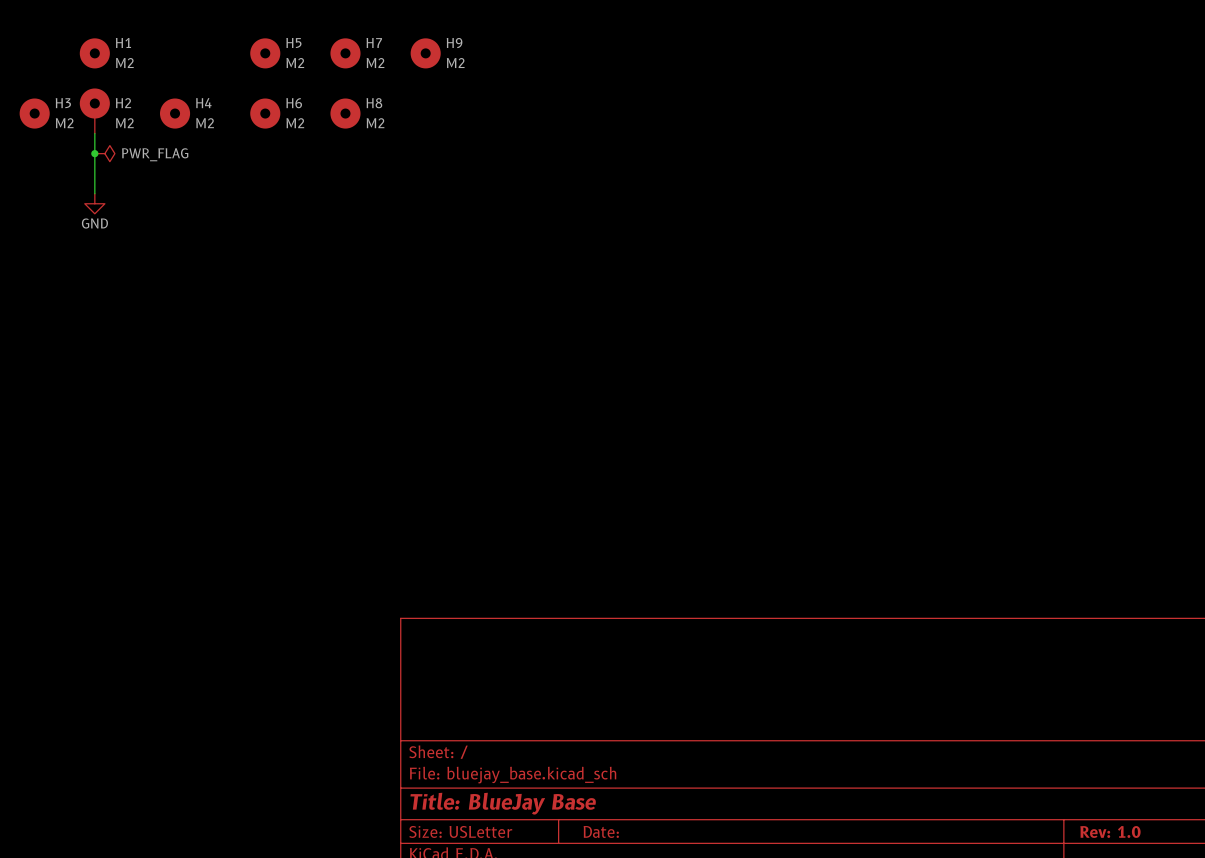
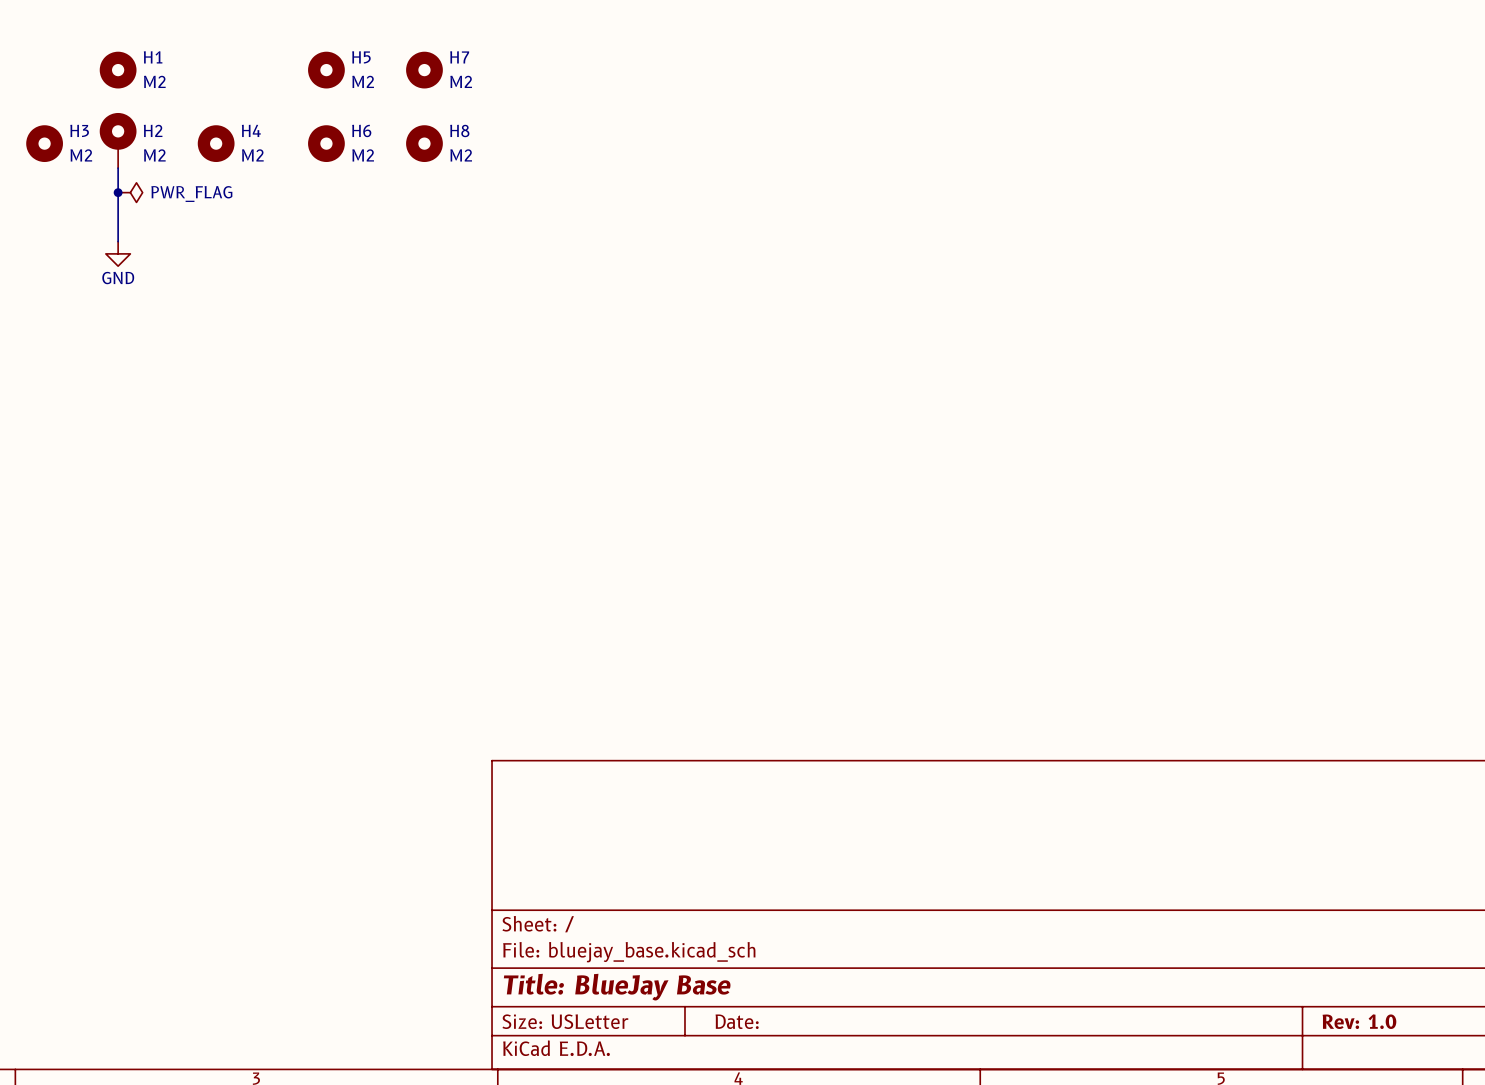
H9: M2 (425, 53) -> none

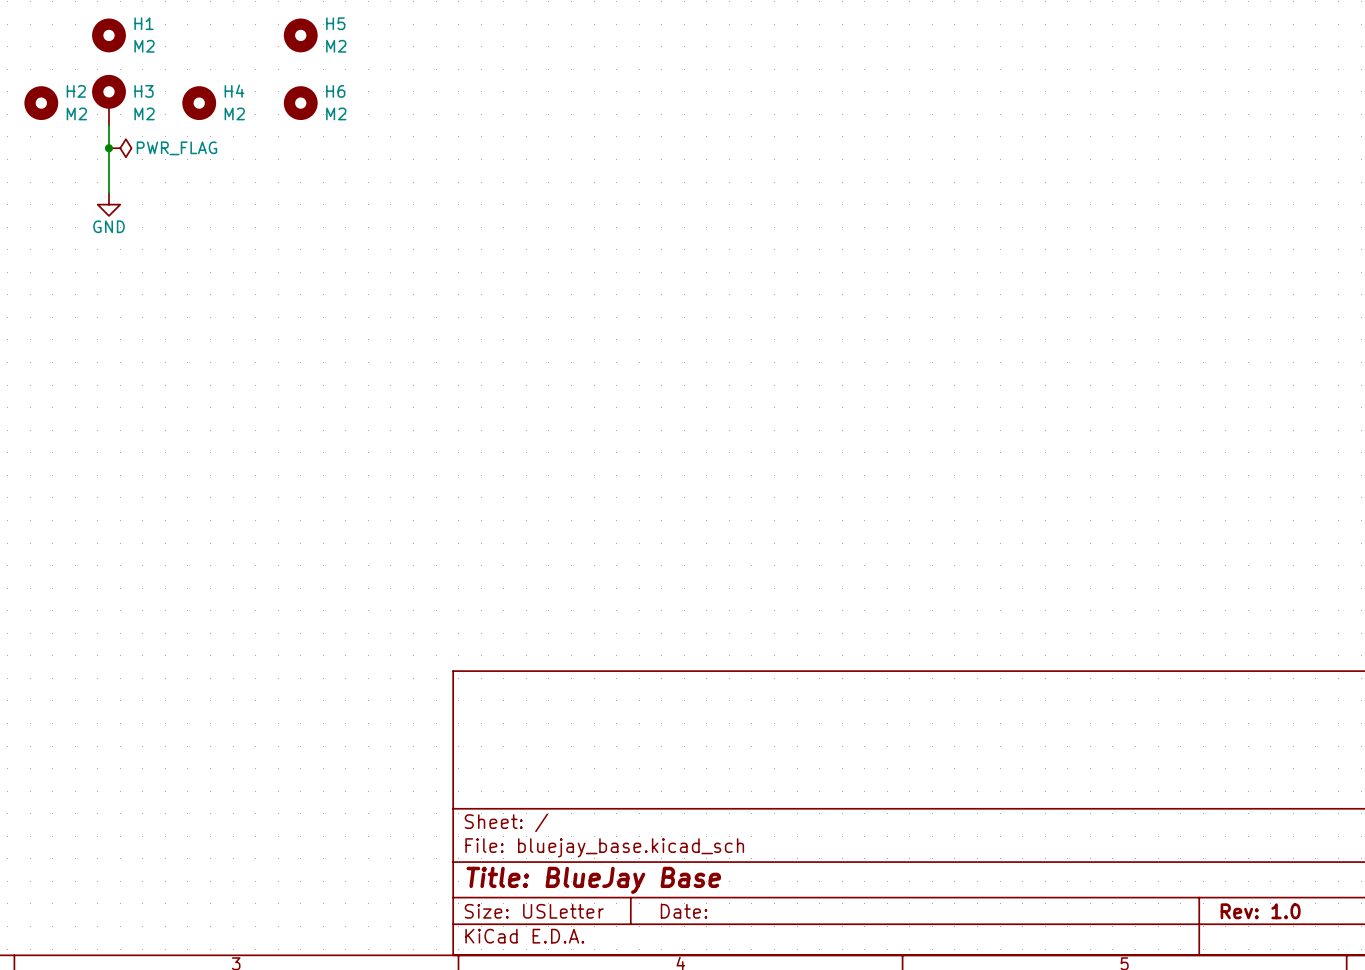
H7: M2 (424, 70) -> none
H3 name: H3 (79, 130) -> H2 (76, 91)
H2 name: H2 (153, 130) -> H3 (143, 91)
H8: M2 (424, 143) -> none

